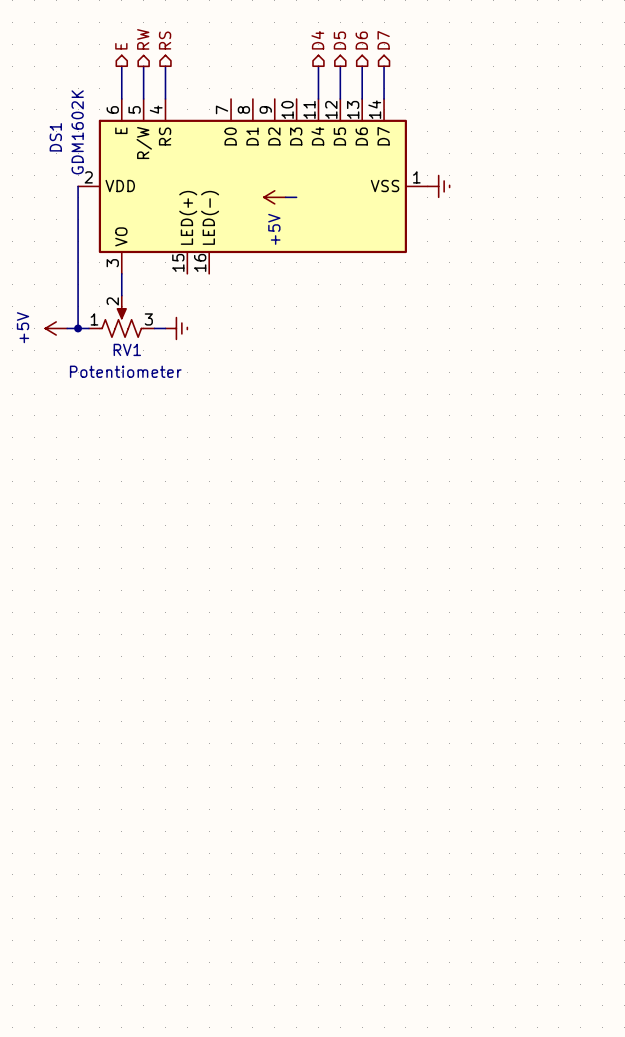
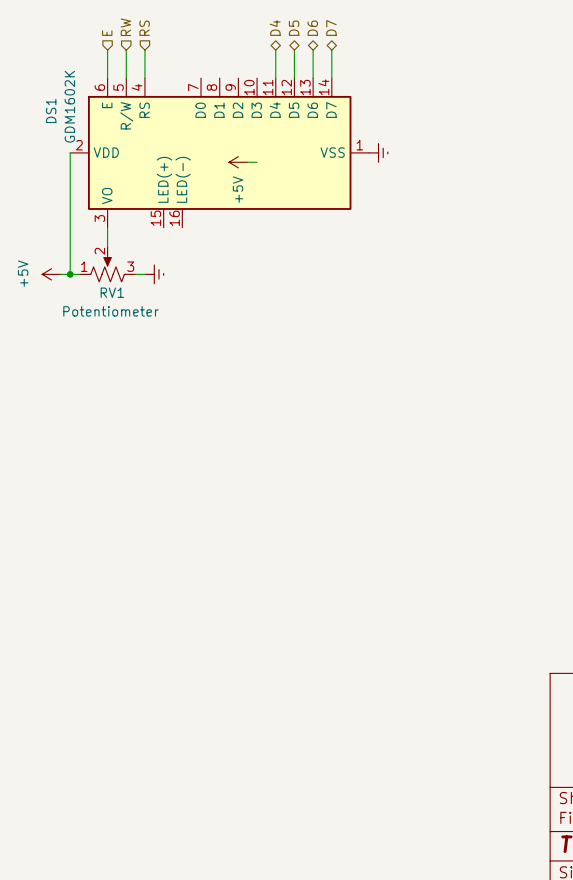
hierarchical label shape: output (143, 39) -> input (125, 27)
hierarchical label shape: output (165, 40) -> input (144, 28)
hierarchical label shape: output (317, 40) -> bidirectional (275, 27)
hierarchical label shape: output (339, 40) -> bidirectional (294, 28)
hierarchical label shape: output (361, 40) -> bidirectional (312, 28)
hierarchical label shape: output (383, 40) -> bidirectional (331, 27)
hierarchical label shape: output (121, 46) -> input (107, 33)

